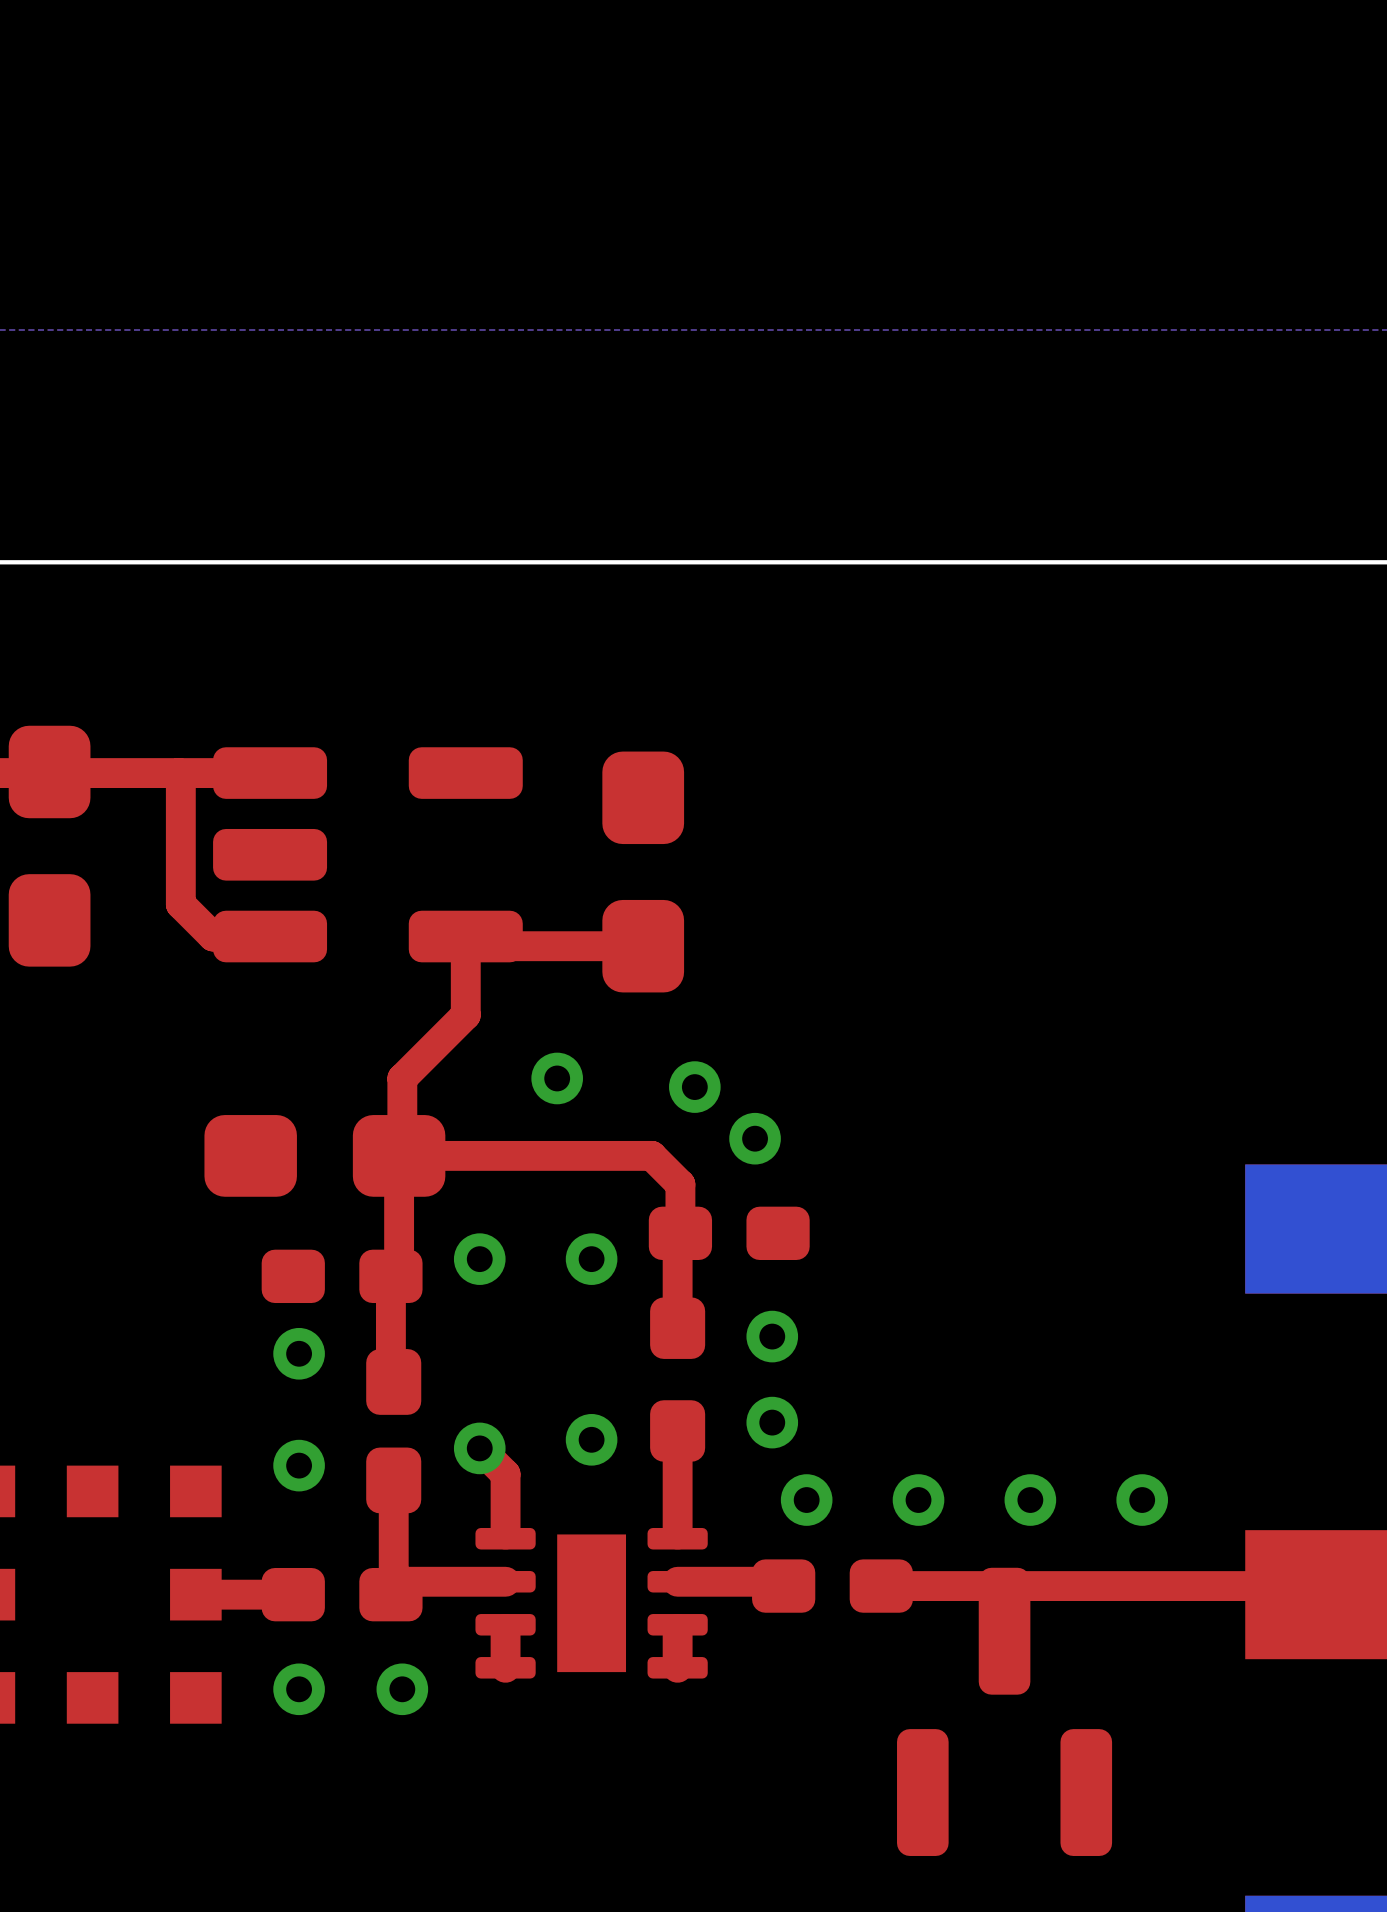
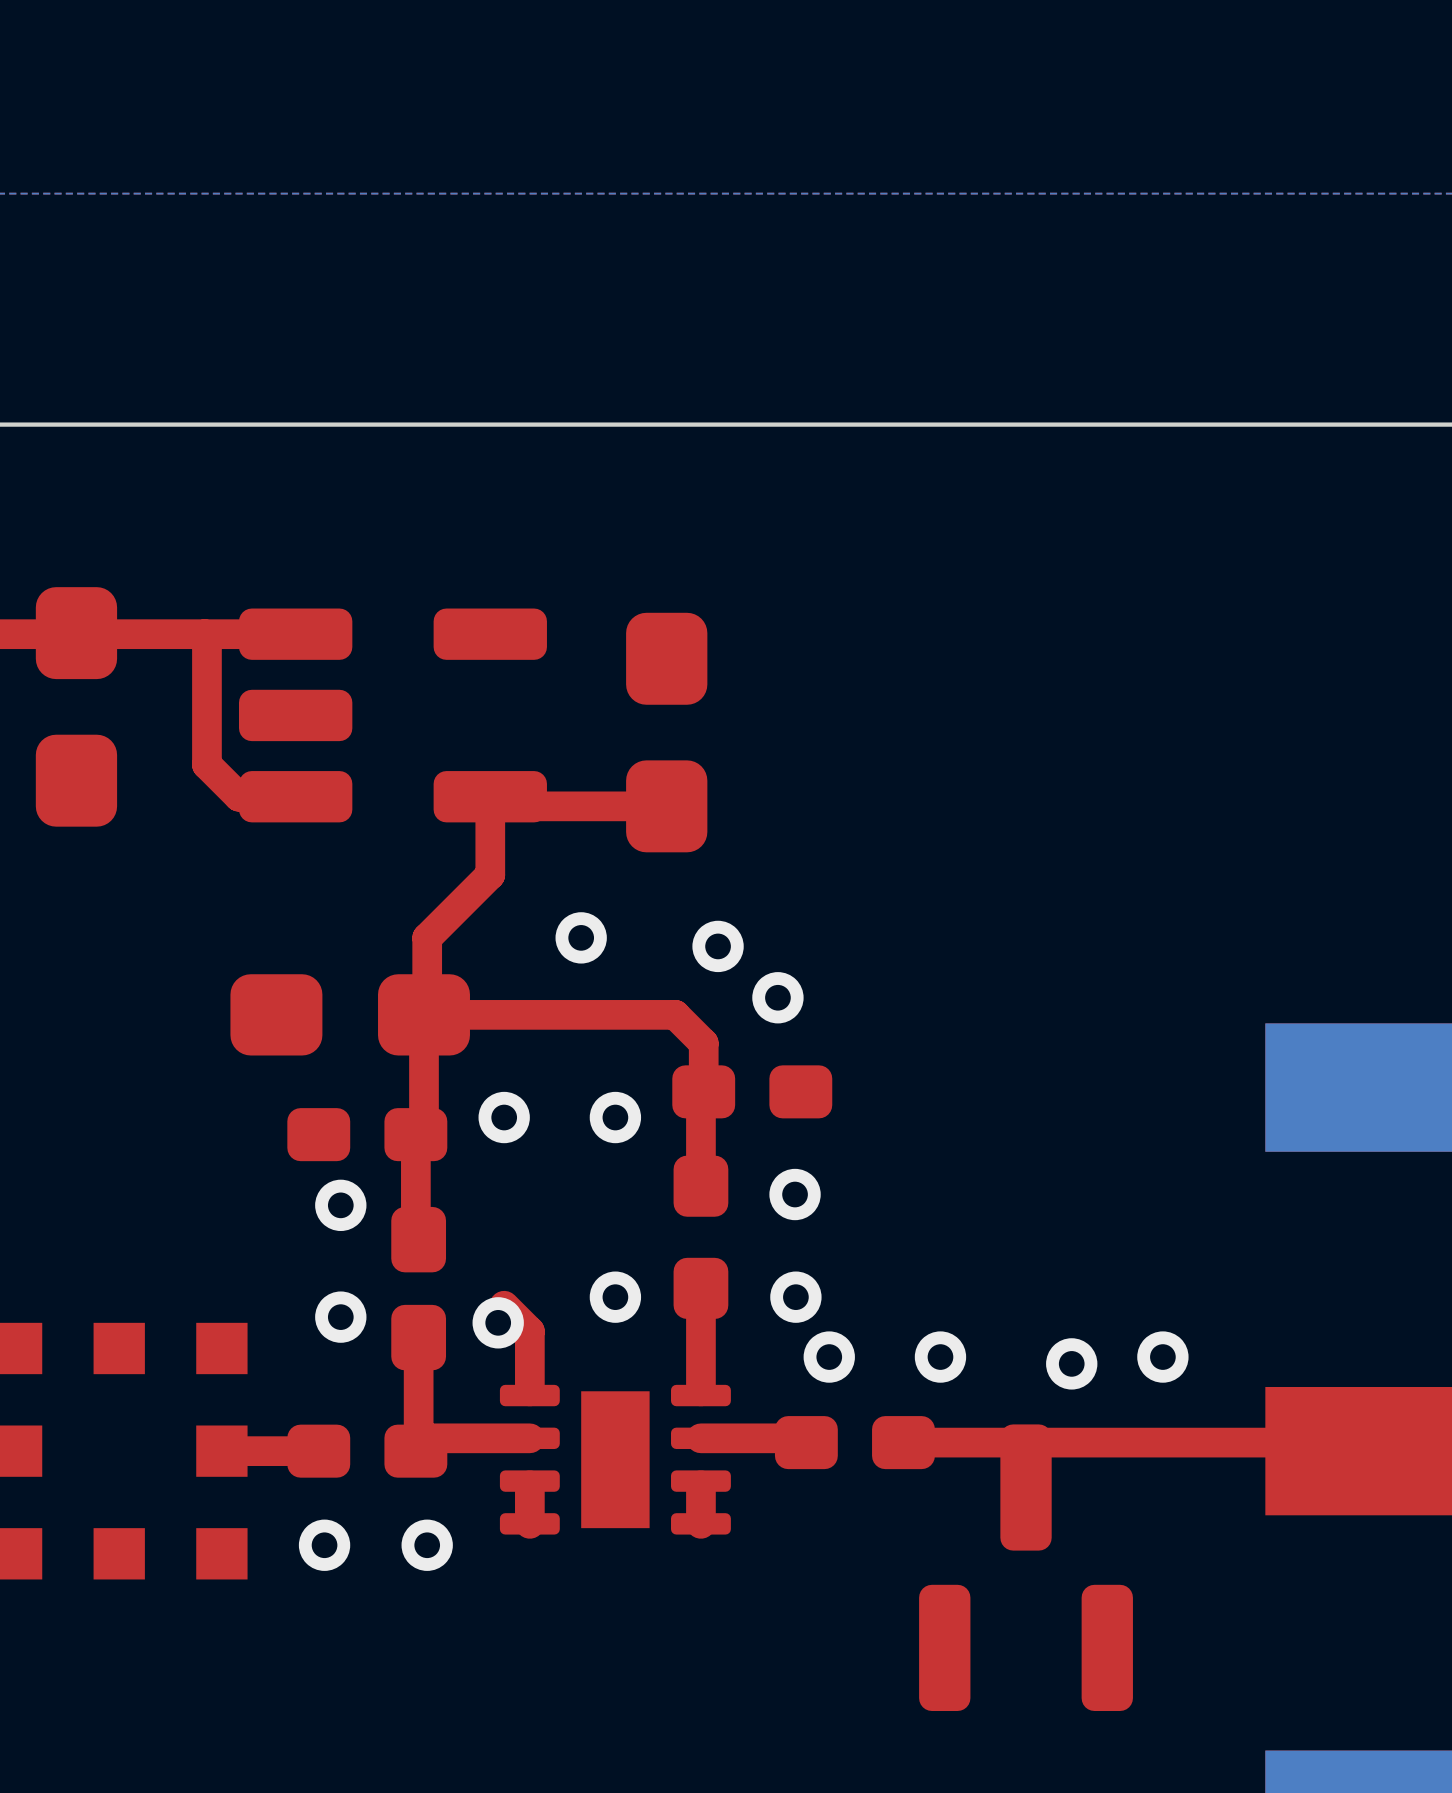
via position: (299, 1353) -> (340, 1205)
via position: (772, 1422) -> (795, 1297)
via position: (479, 1448) -> (498, 1322)
via position: (299, 1465) -> (340, 1317)
via position: (1030, 1500) -> (1071, 1363)

